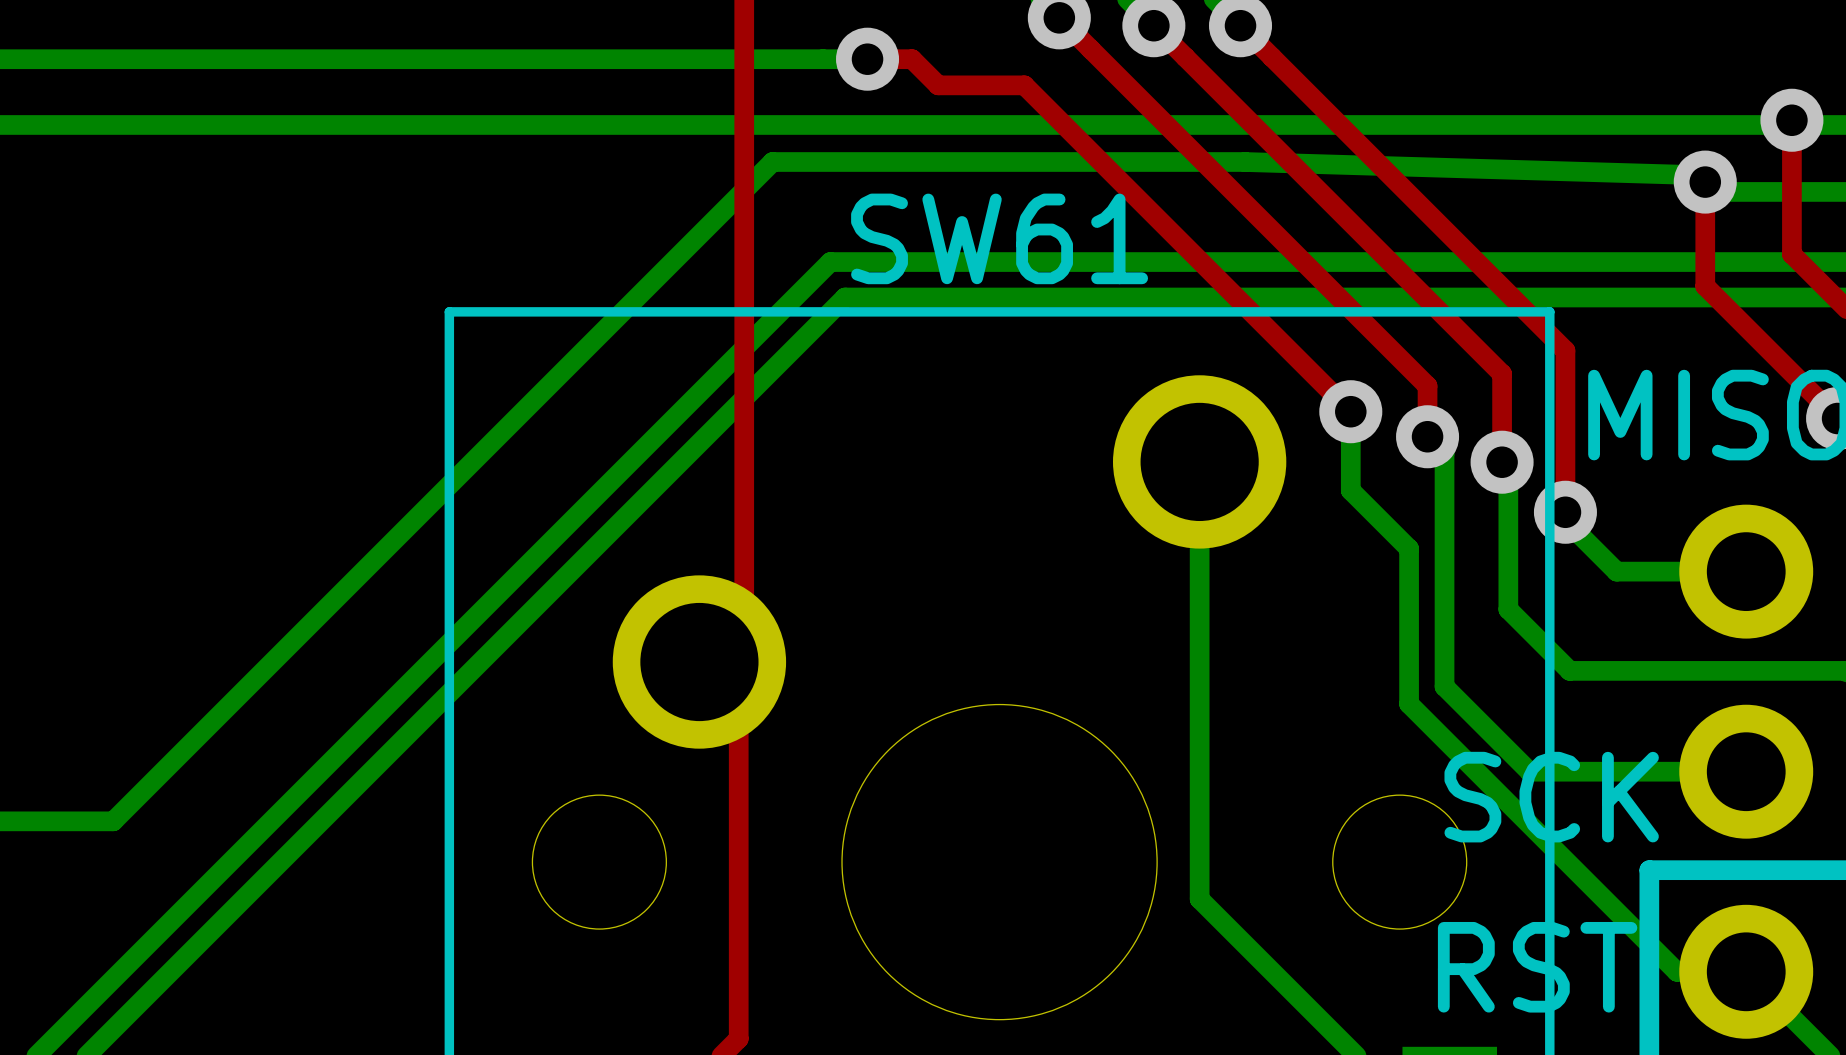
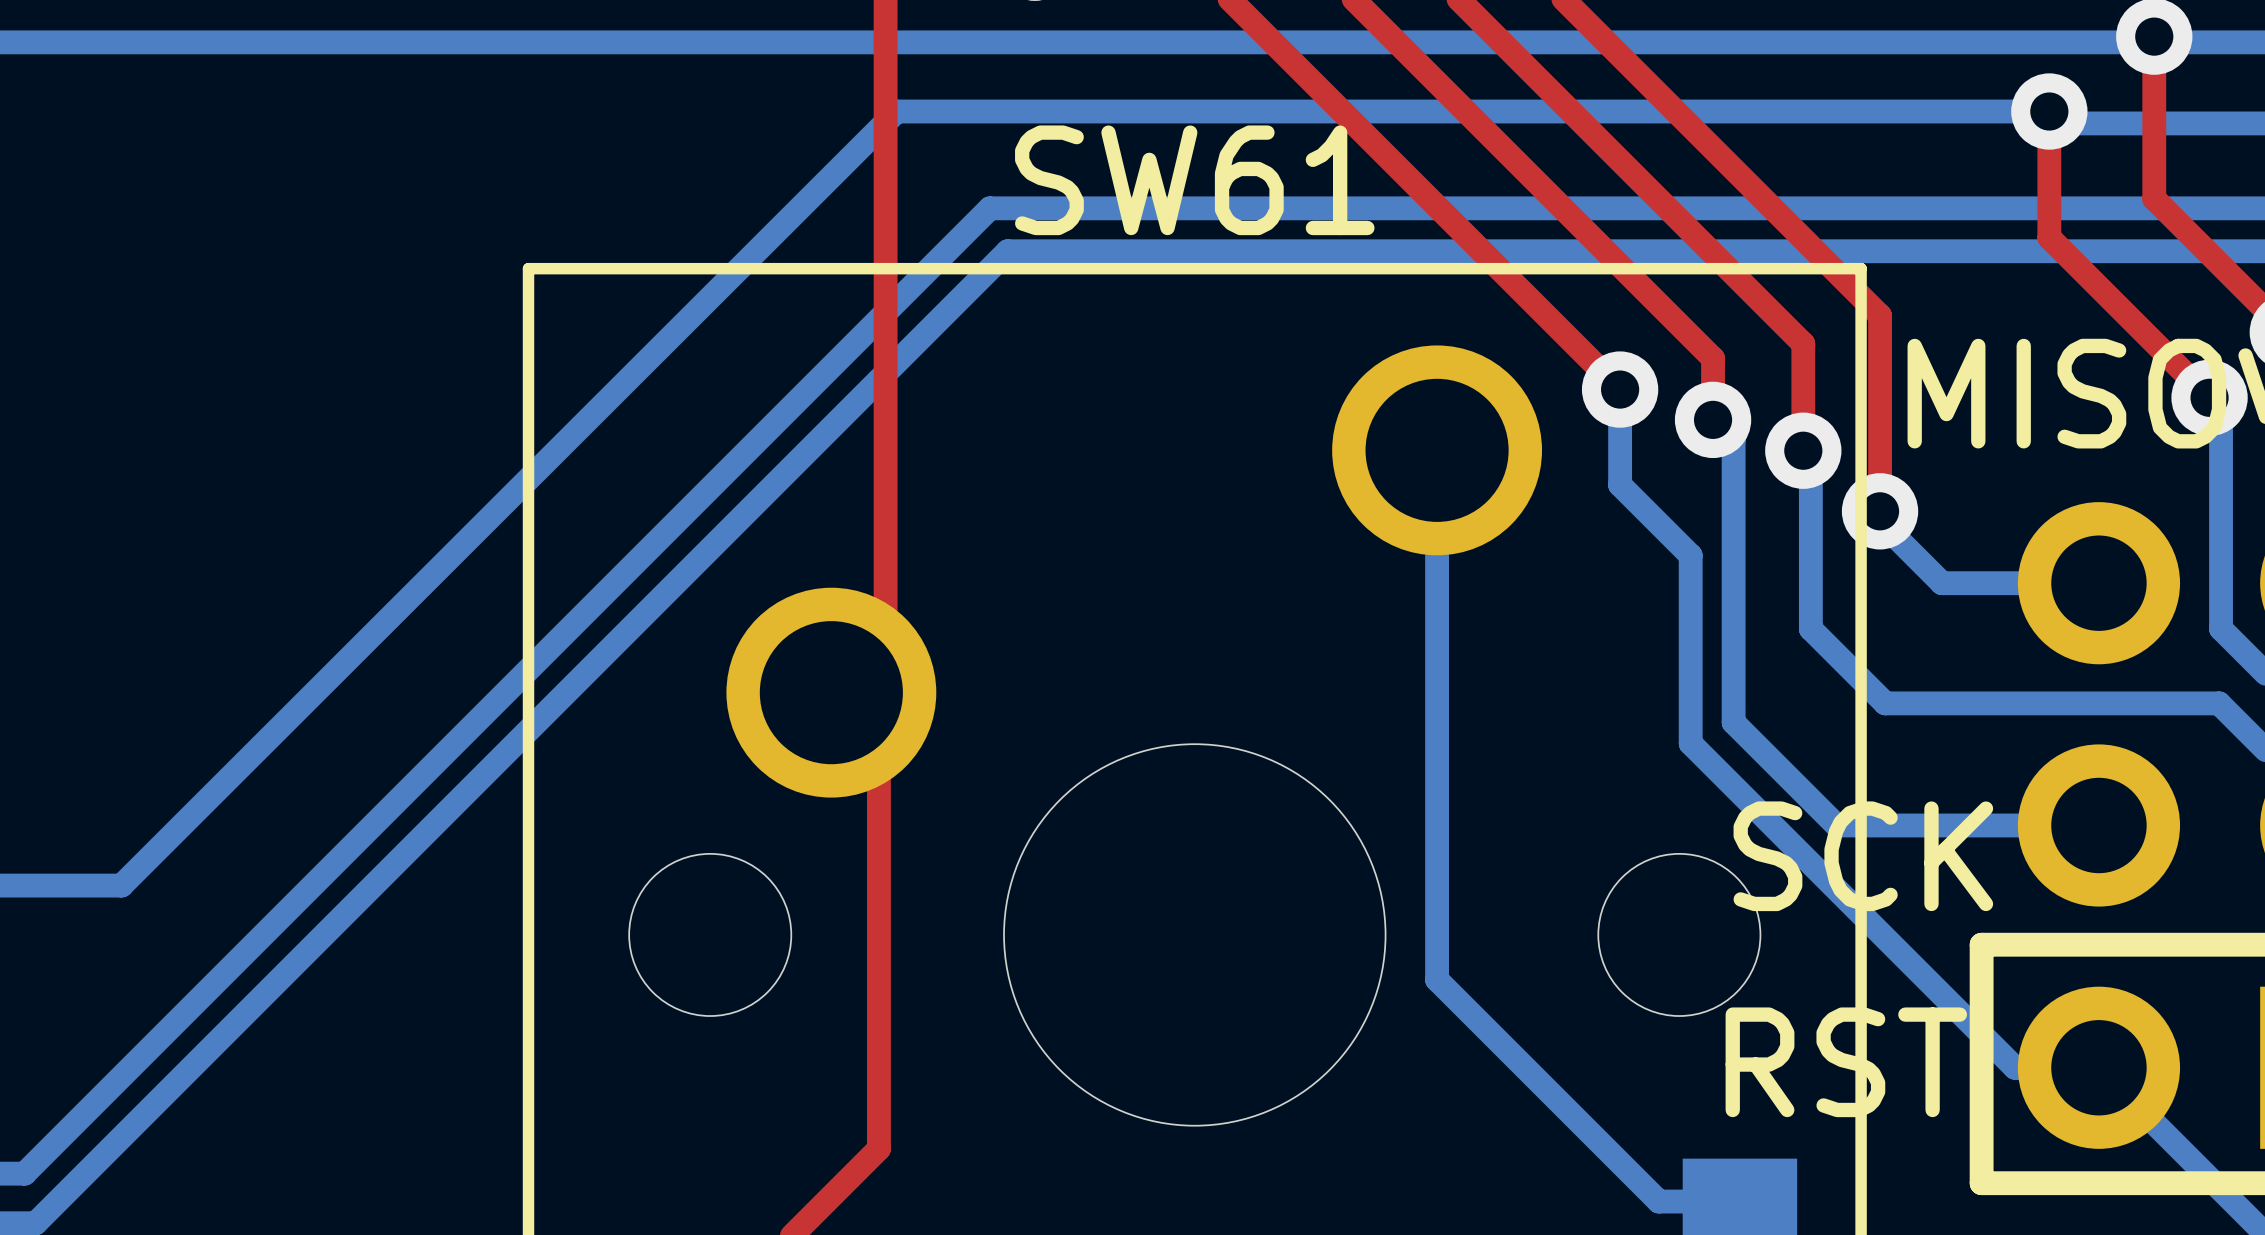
bottom track: (1705, 175) (1245, 162) (772, 162) (113, 821) -> (2049, 111) (896, 111) (121, 885)

